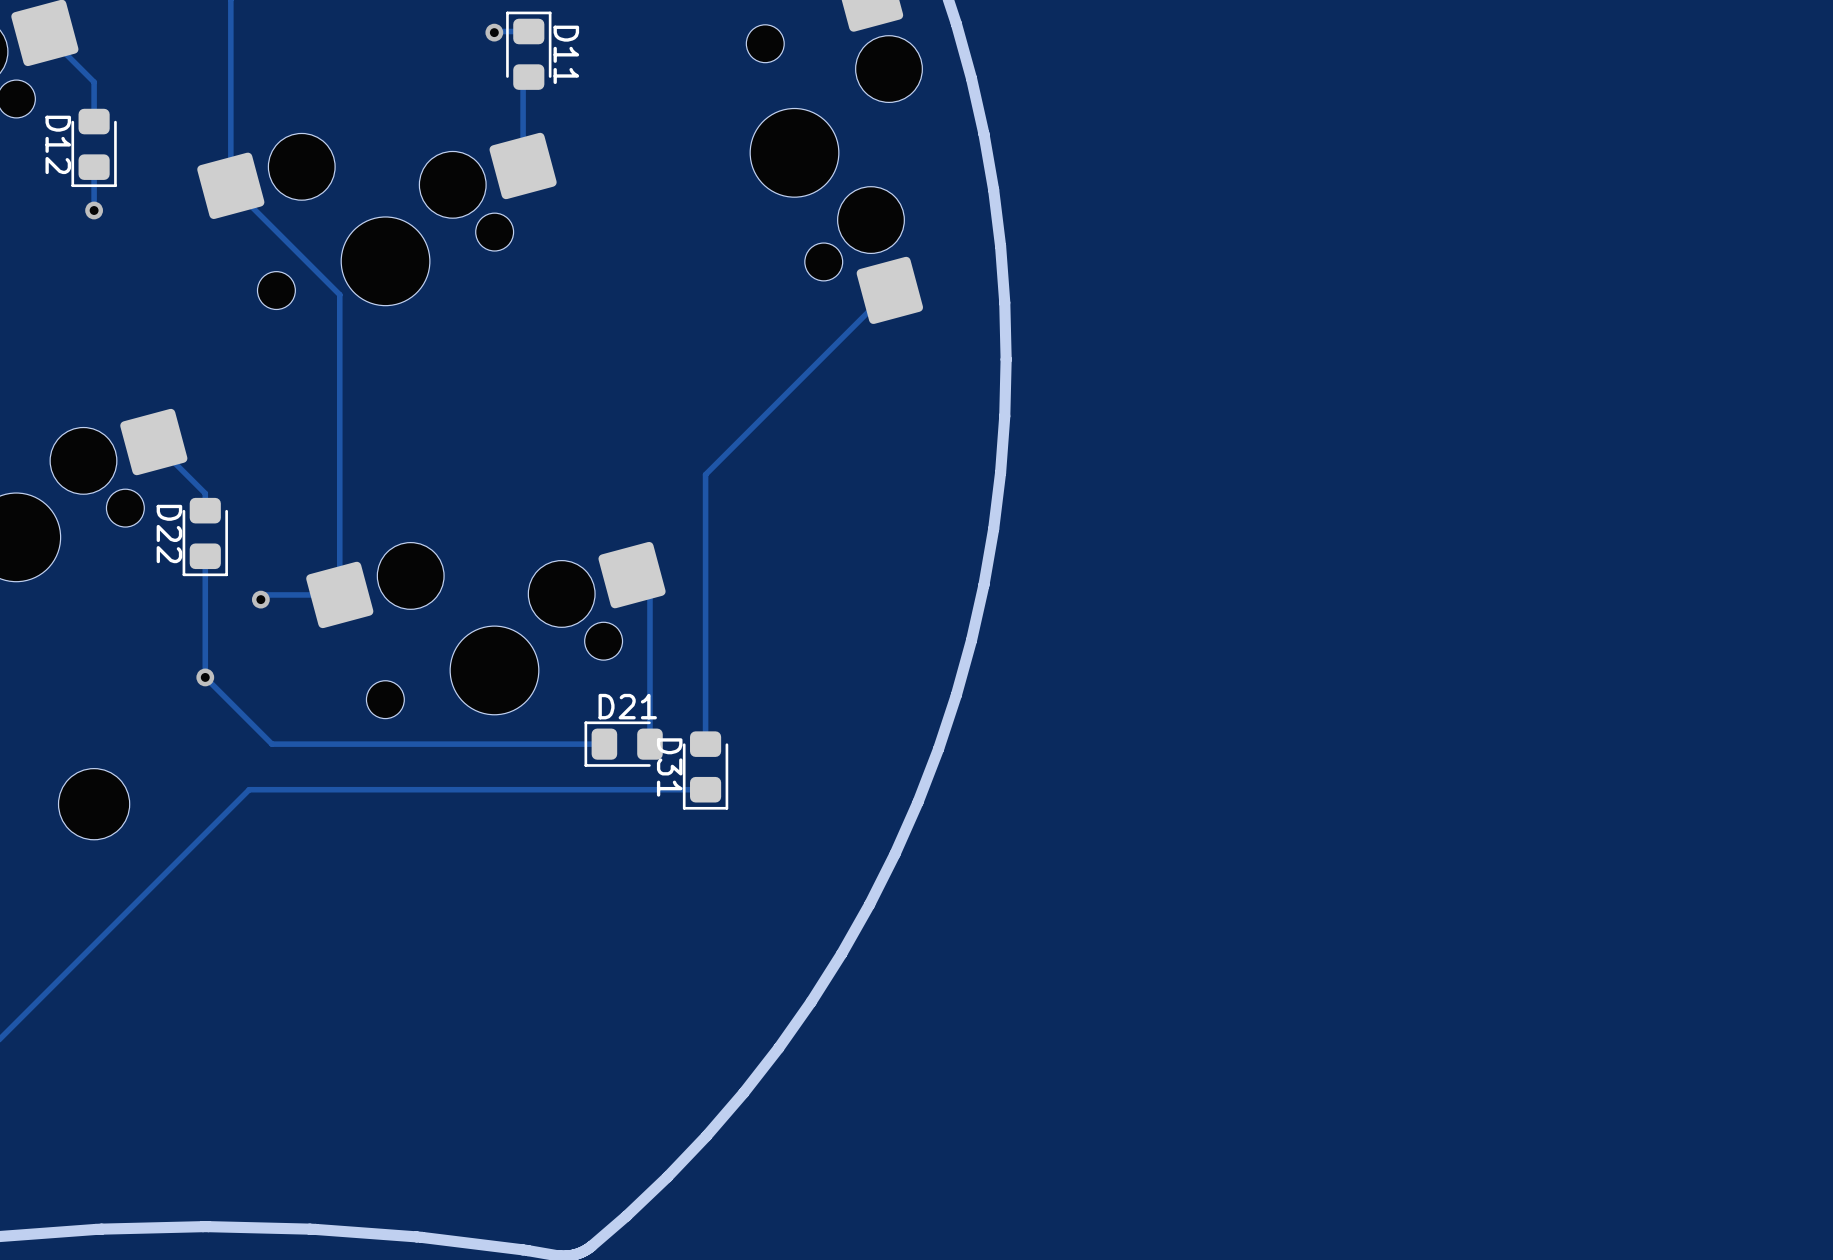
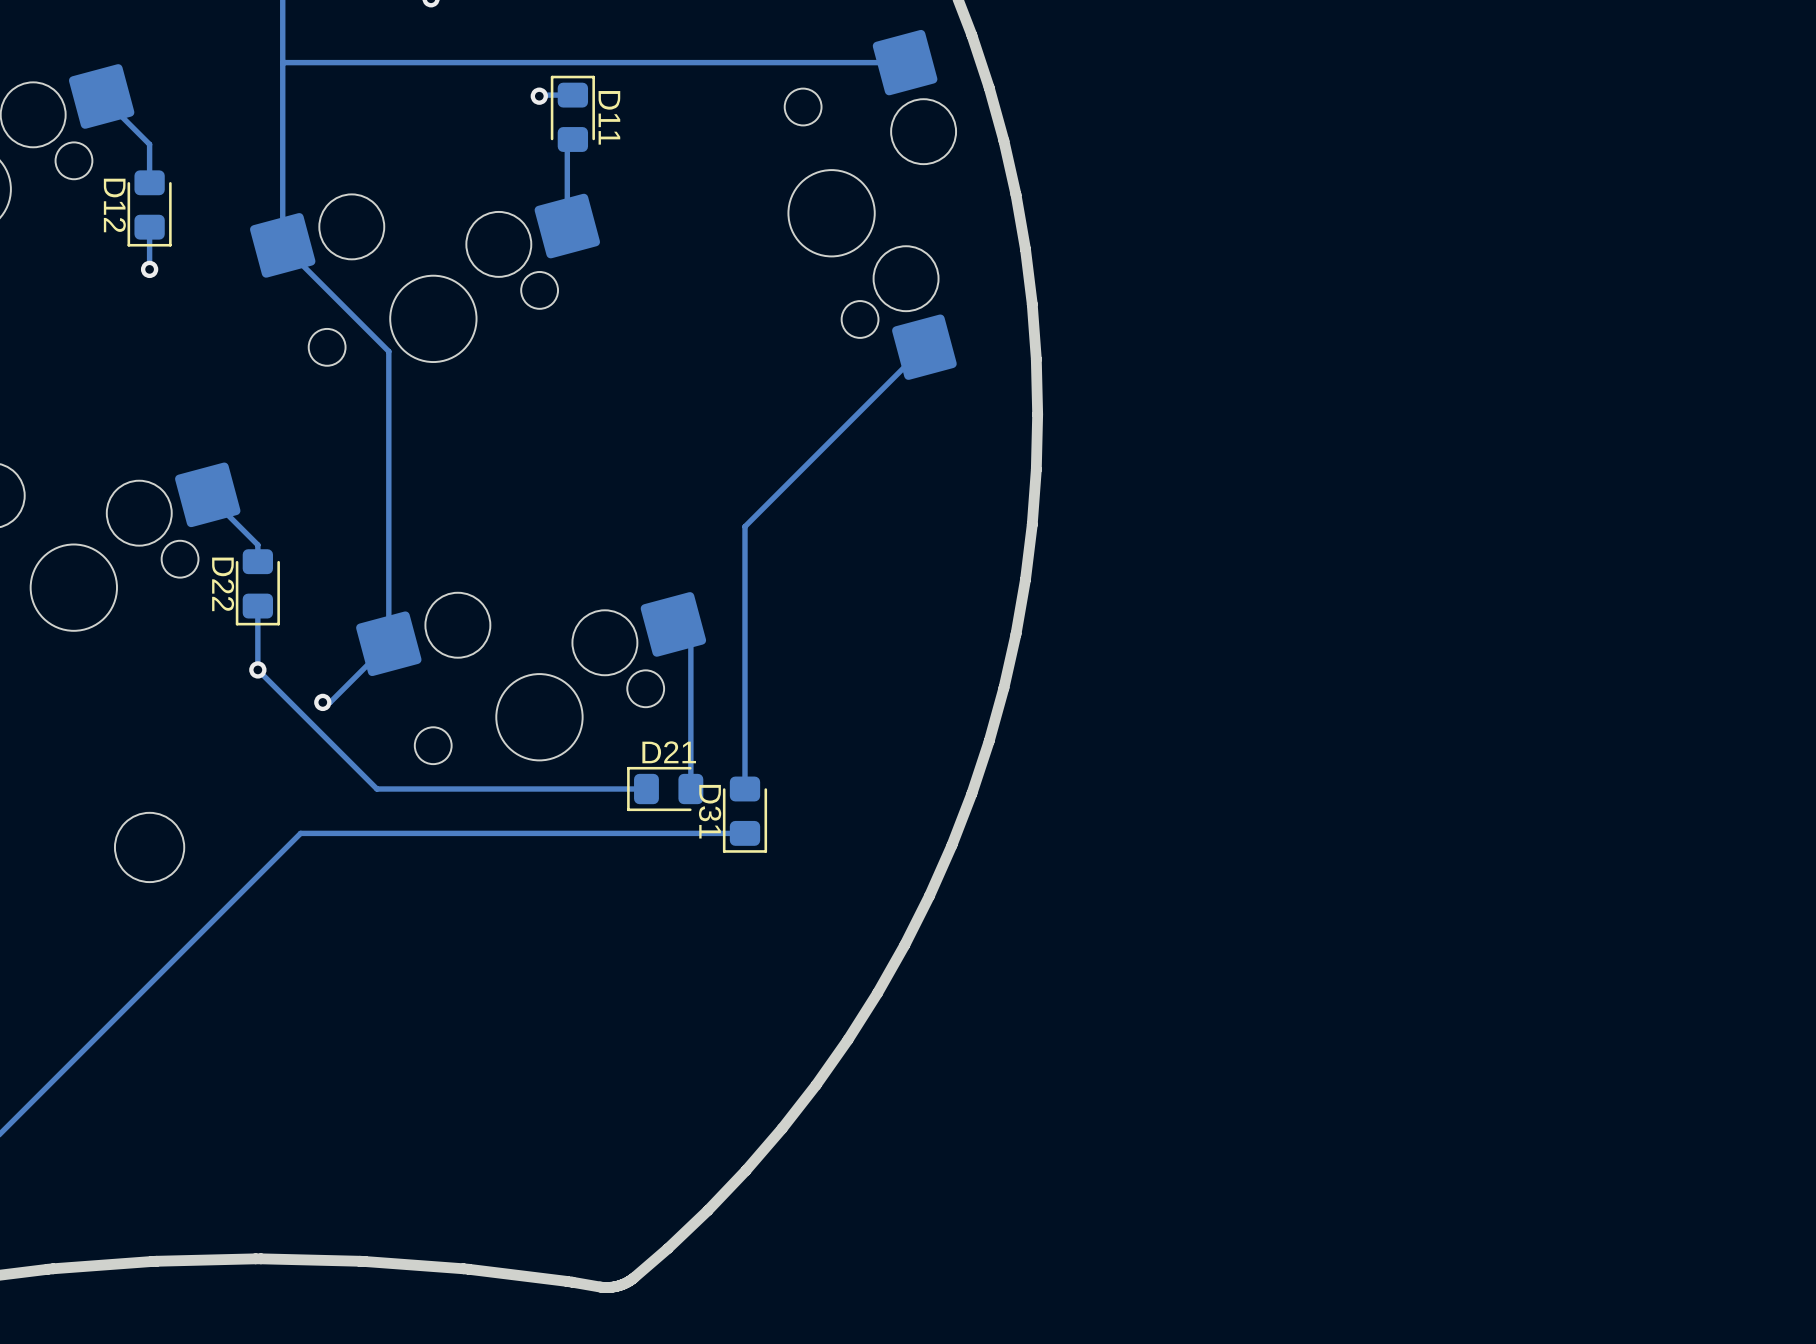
track: (339, 594) (265, 594) (260, 599) -> (388, 643) (330, 702) (322, 702)
via: (260, 599) -> none
track: (205, 621) (205, 677) (271, 744) (327, 744) -> (257, 669) (376, 789)
via: none -> (257, 669)
via: none -> (322, 702)
via: (205, 677) -> none

